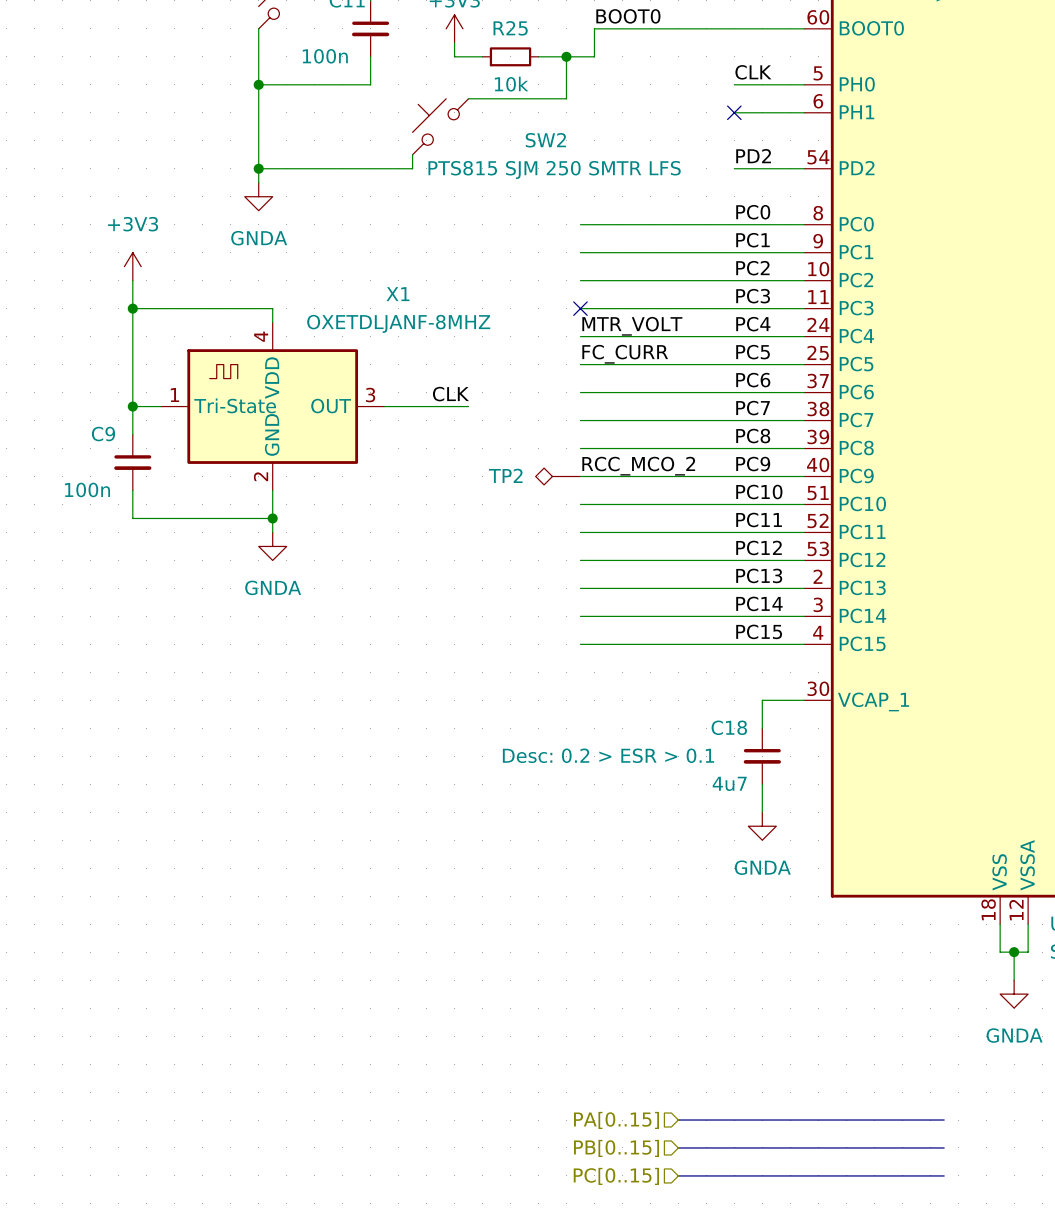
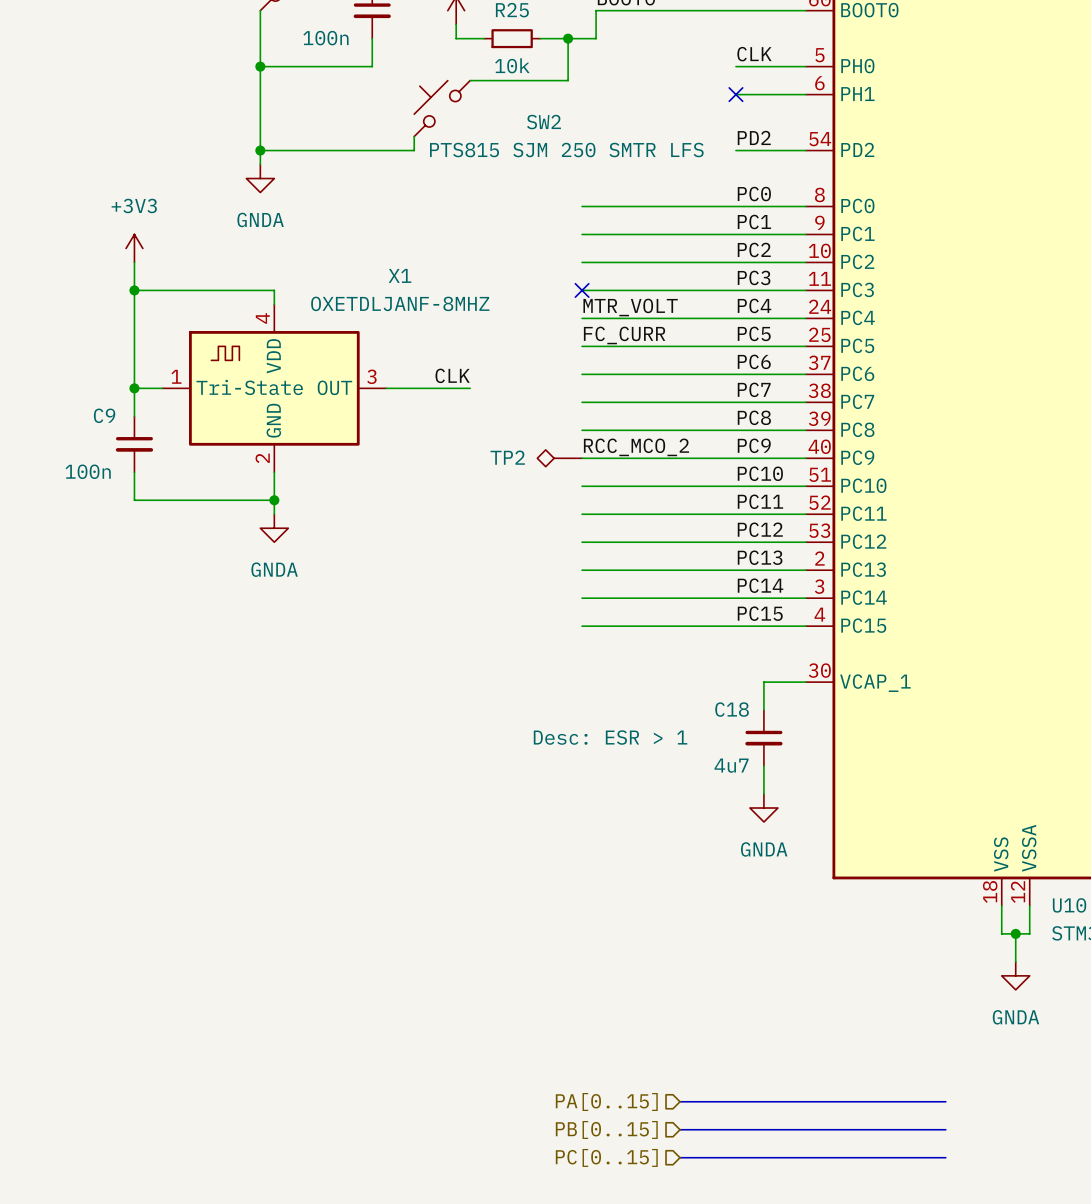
C18 text: Desc: 0.2 > ESR > 0.1 (608, 755) -> Desc: ESR > 1 (610, 737)

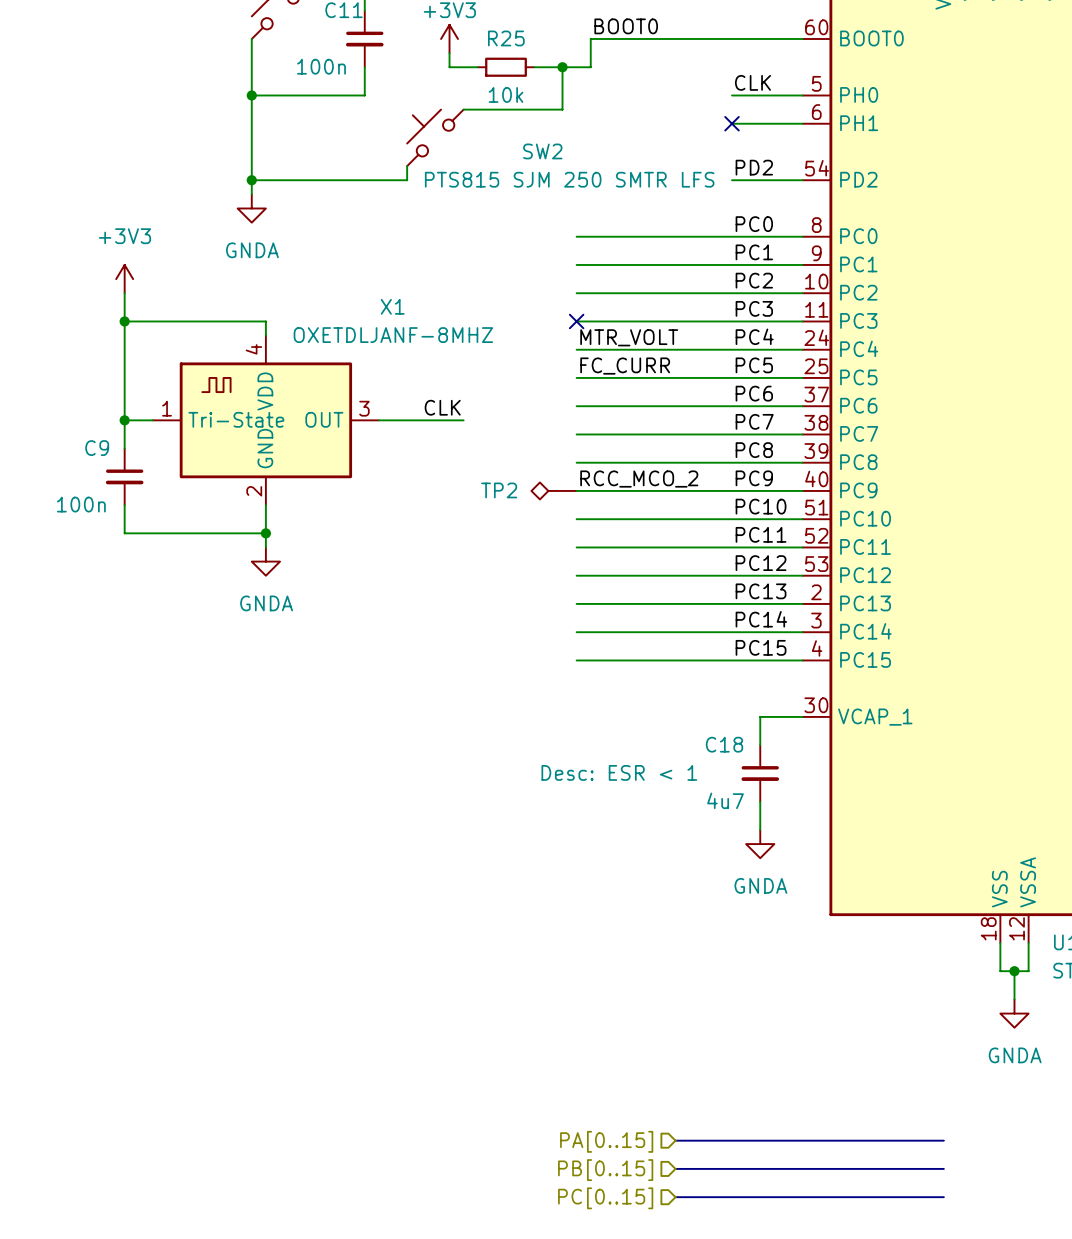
C18 text: Desc: ESR > 1 (610, 737) -> Desc: ESR < 1 (619, 772)

